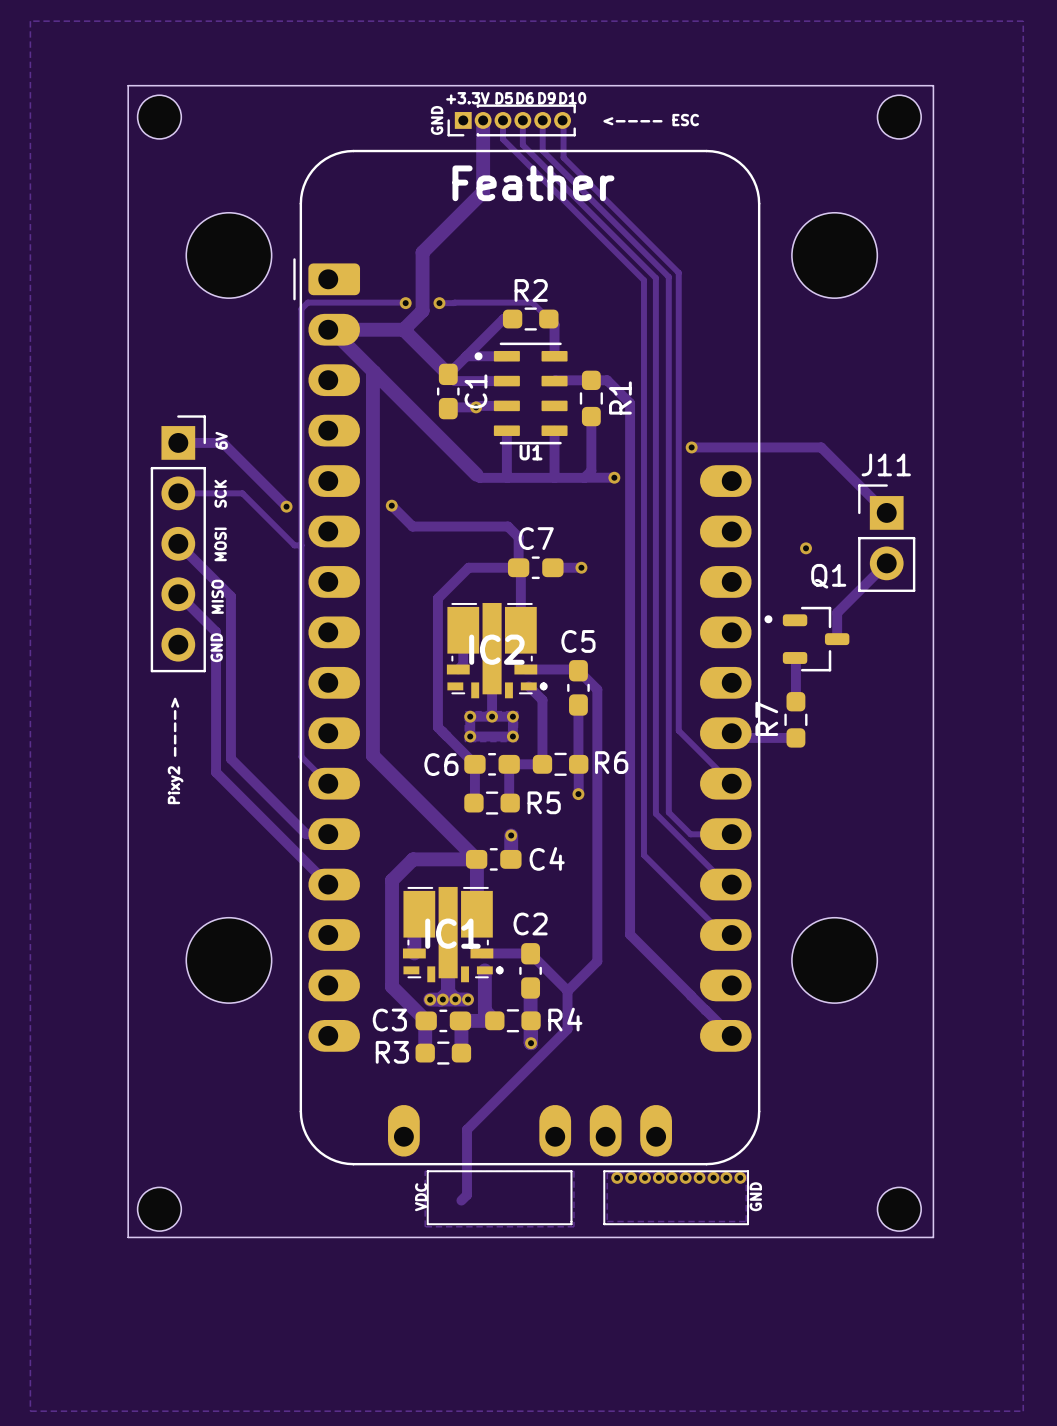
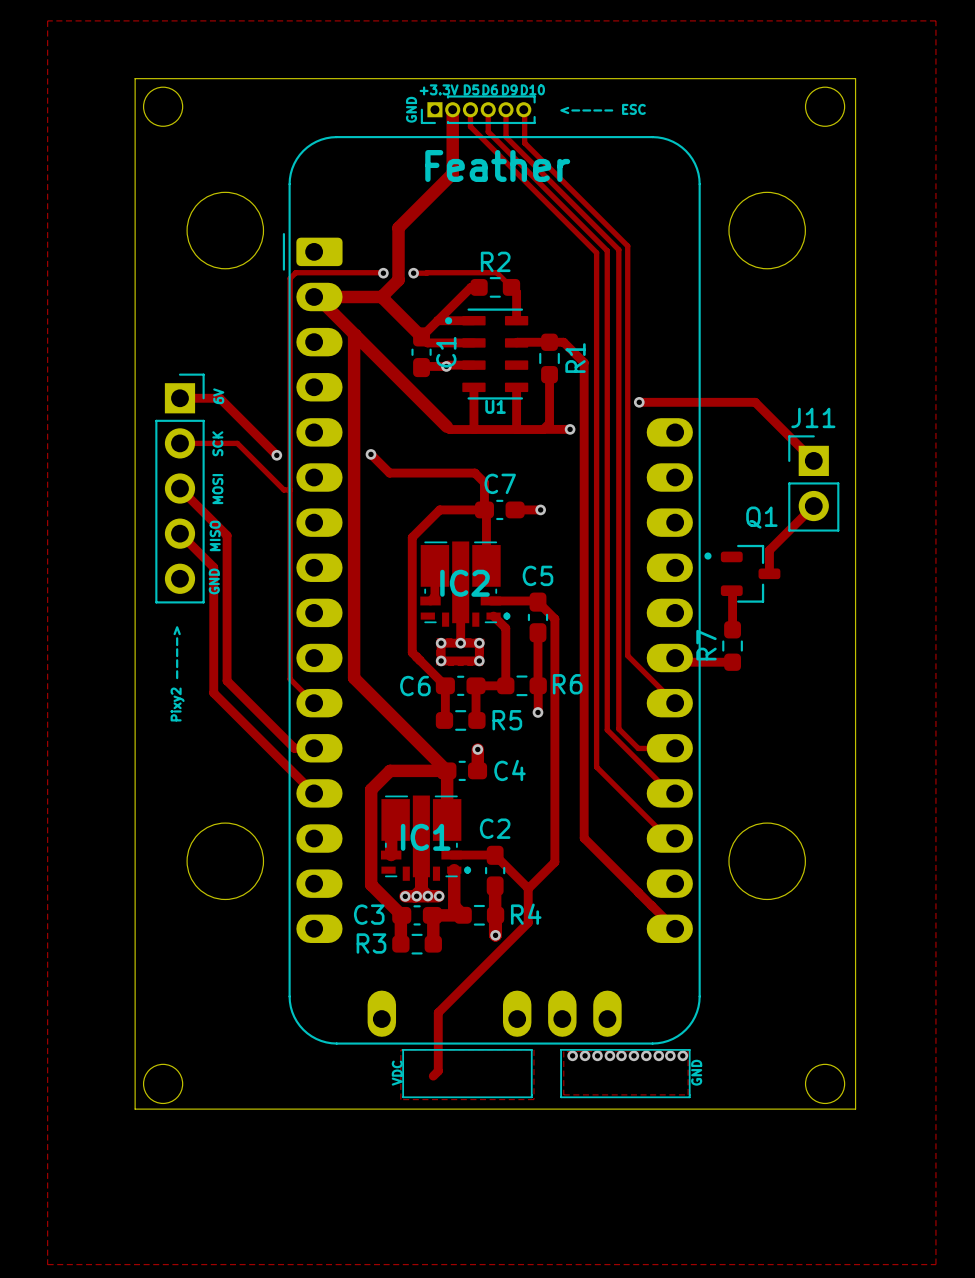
via: (806, 548) -> none

